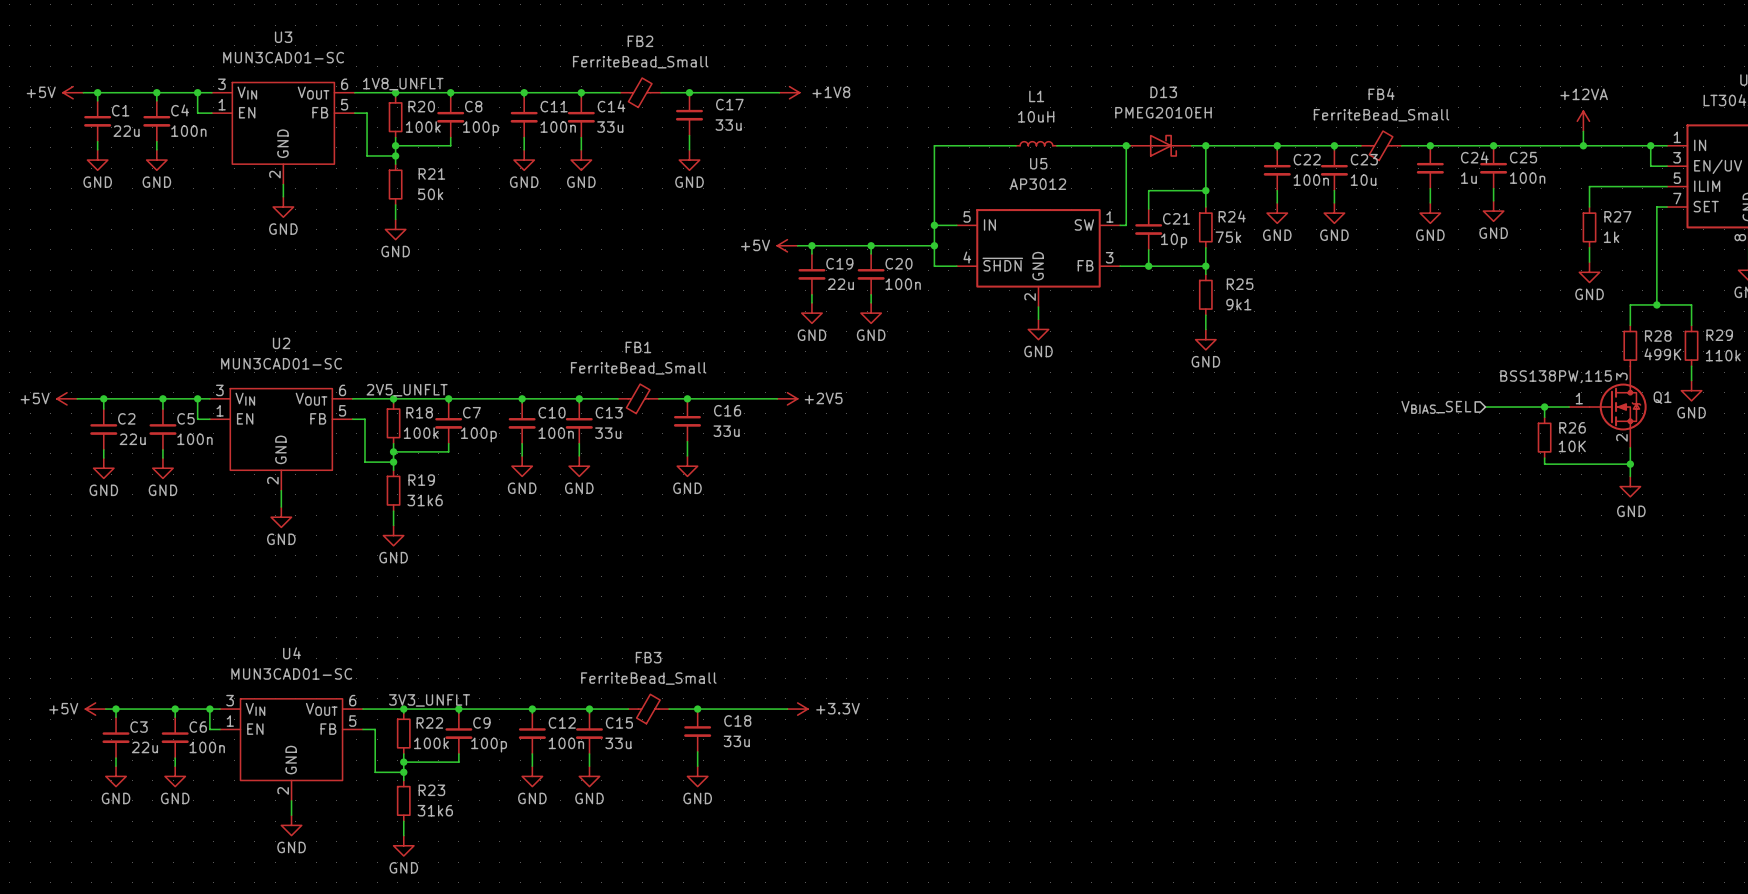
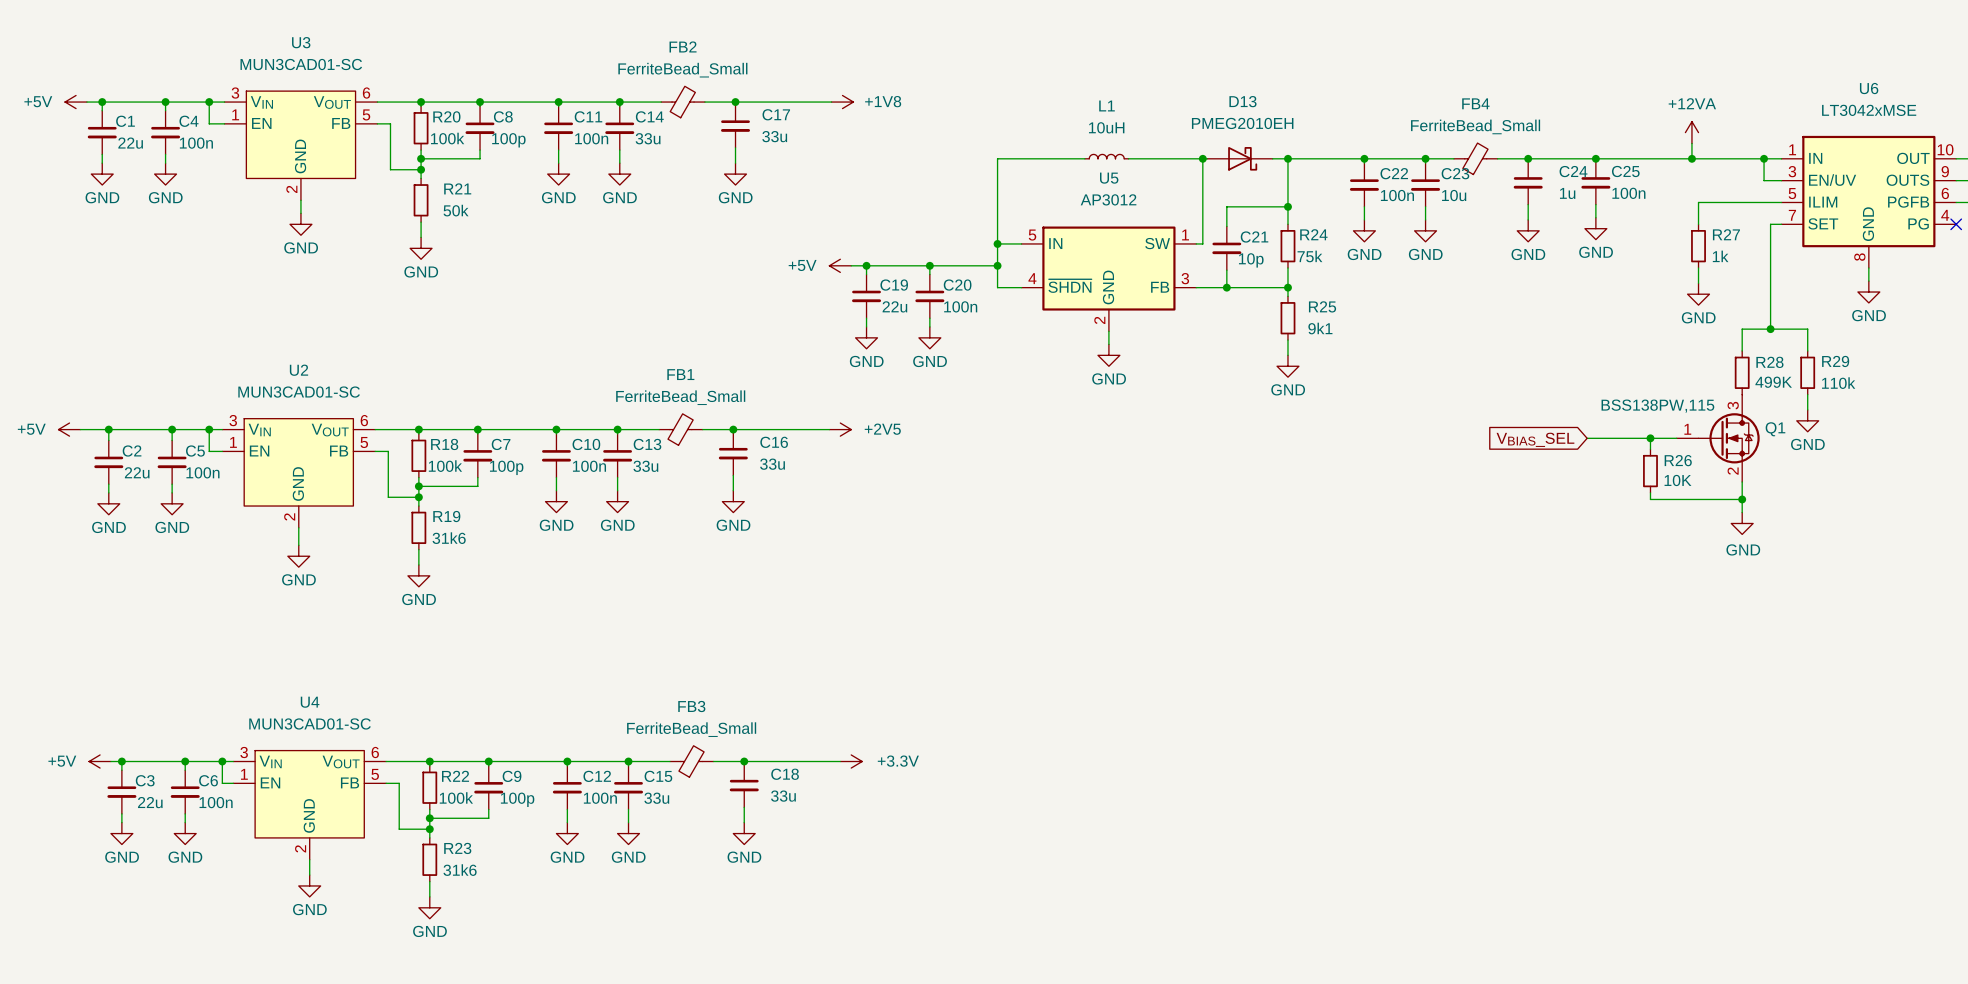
label: 1V8_UNFLT (403, 84) -> none
label: 2V5_UNFLT (407, 390) -> none
hierarchical label: VBIAS_SEL (1436, 407) -> none
global label: none -> VBIAS_SEL (1535, 439)
label: 3V3_UNFLT (429, 700) -> none

